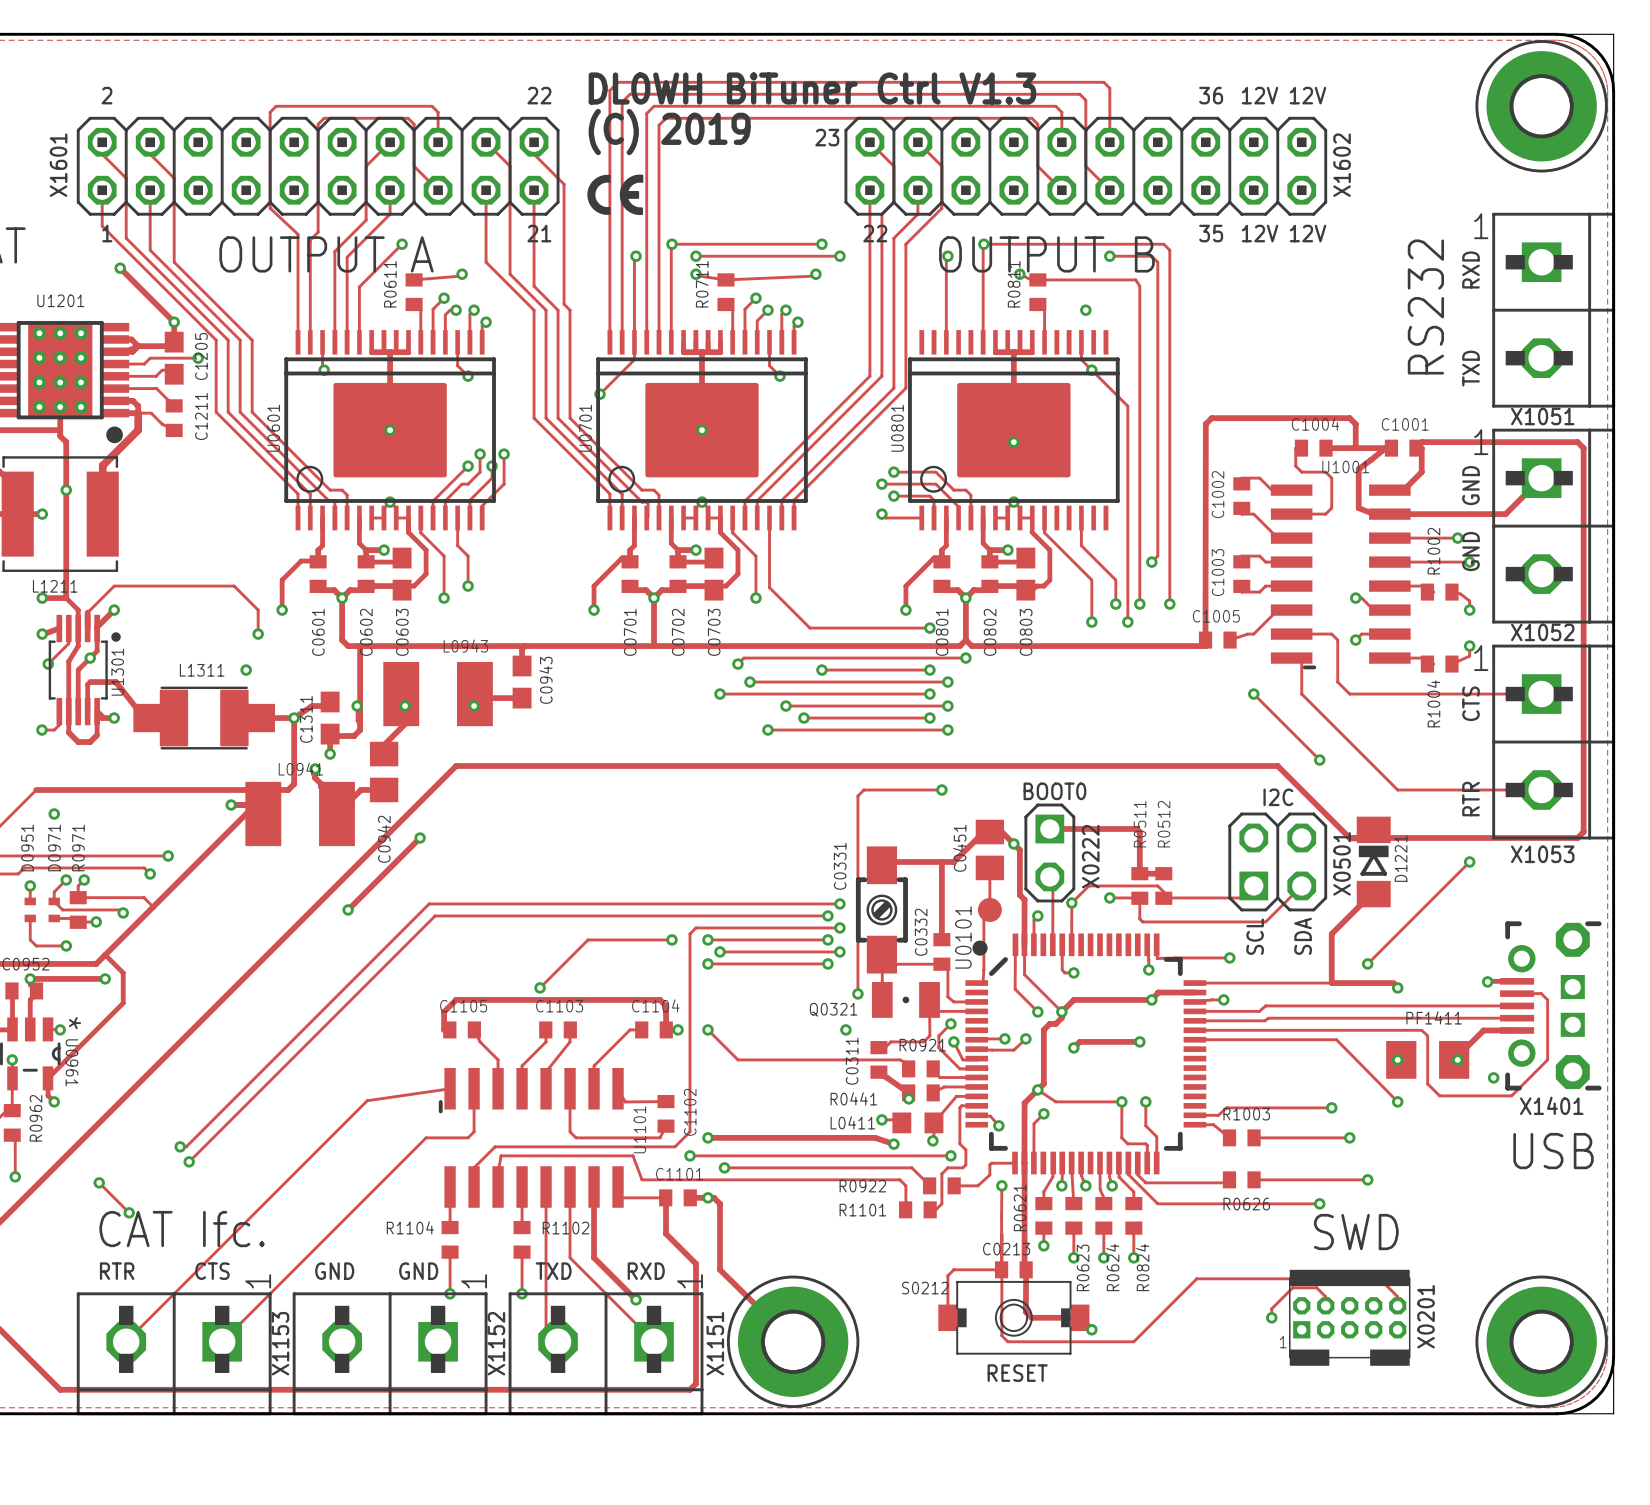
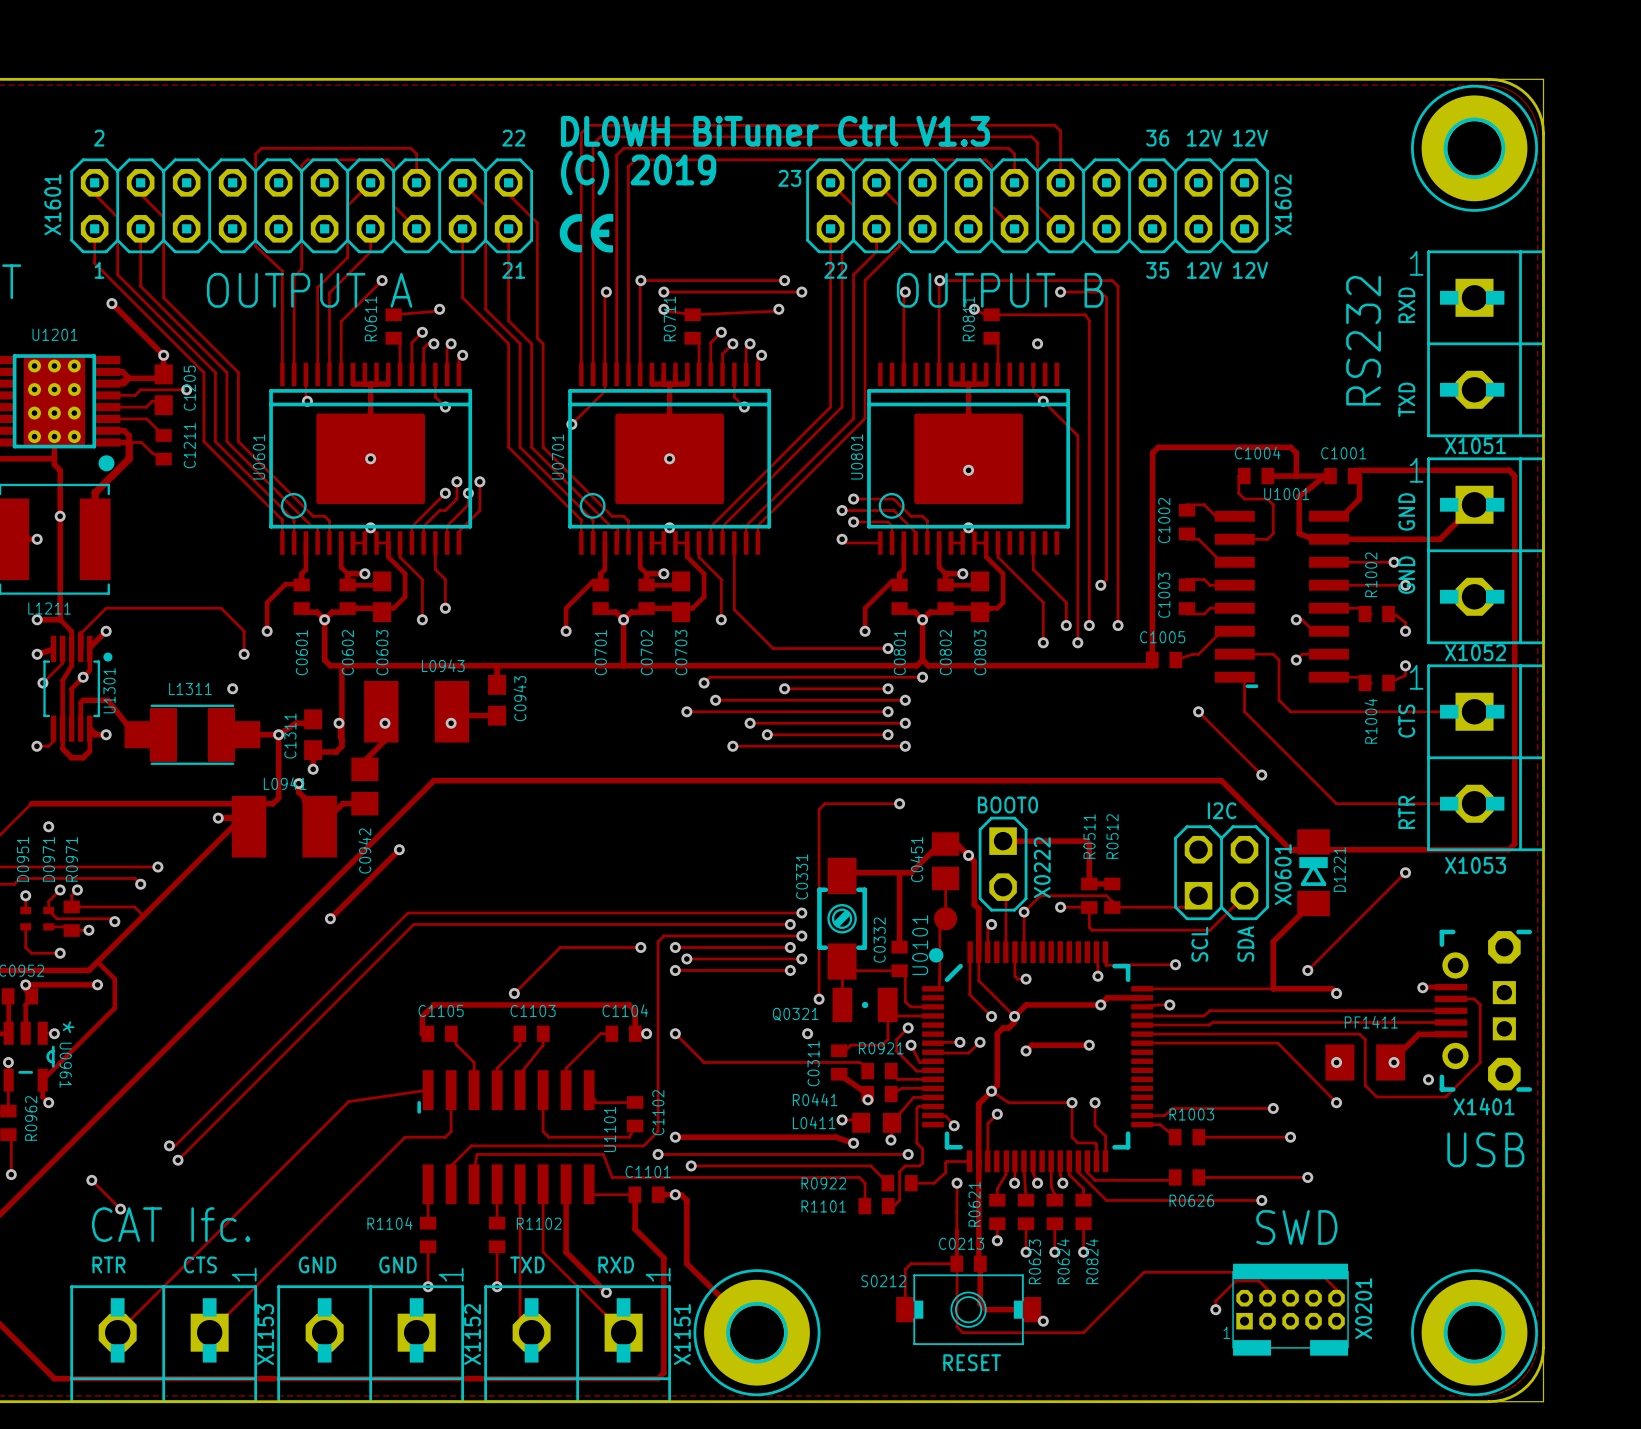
X0501 name: X0501 (1342, 863) -> X0601 (1283, 874)

